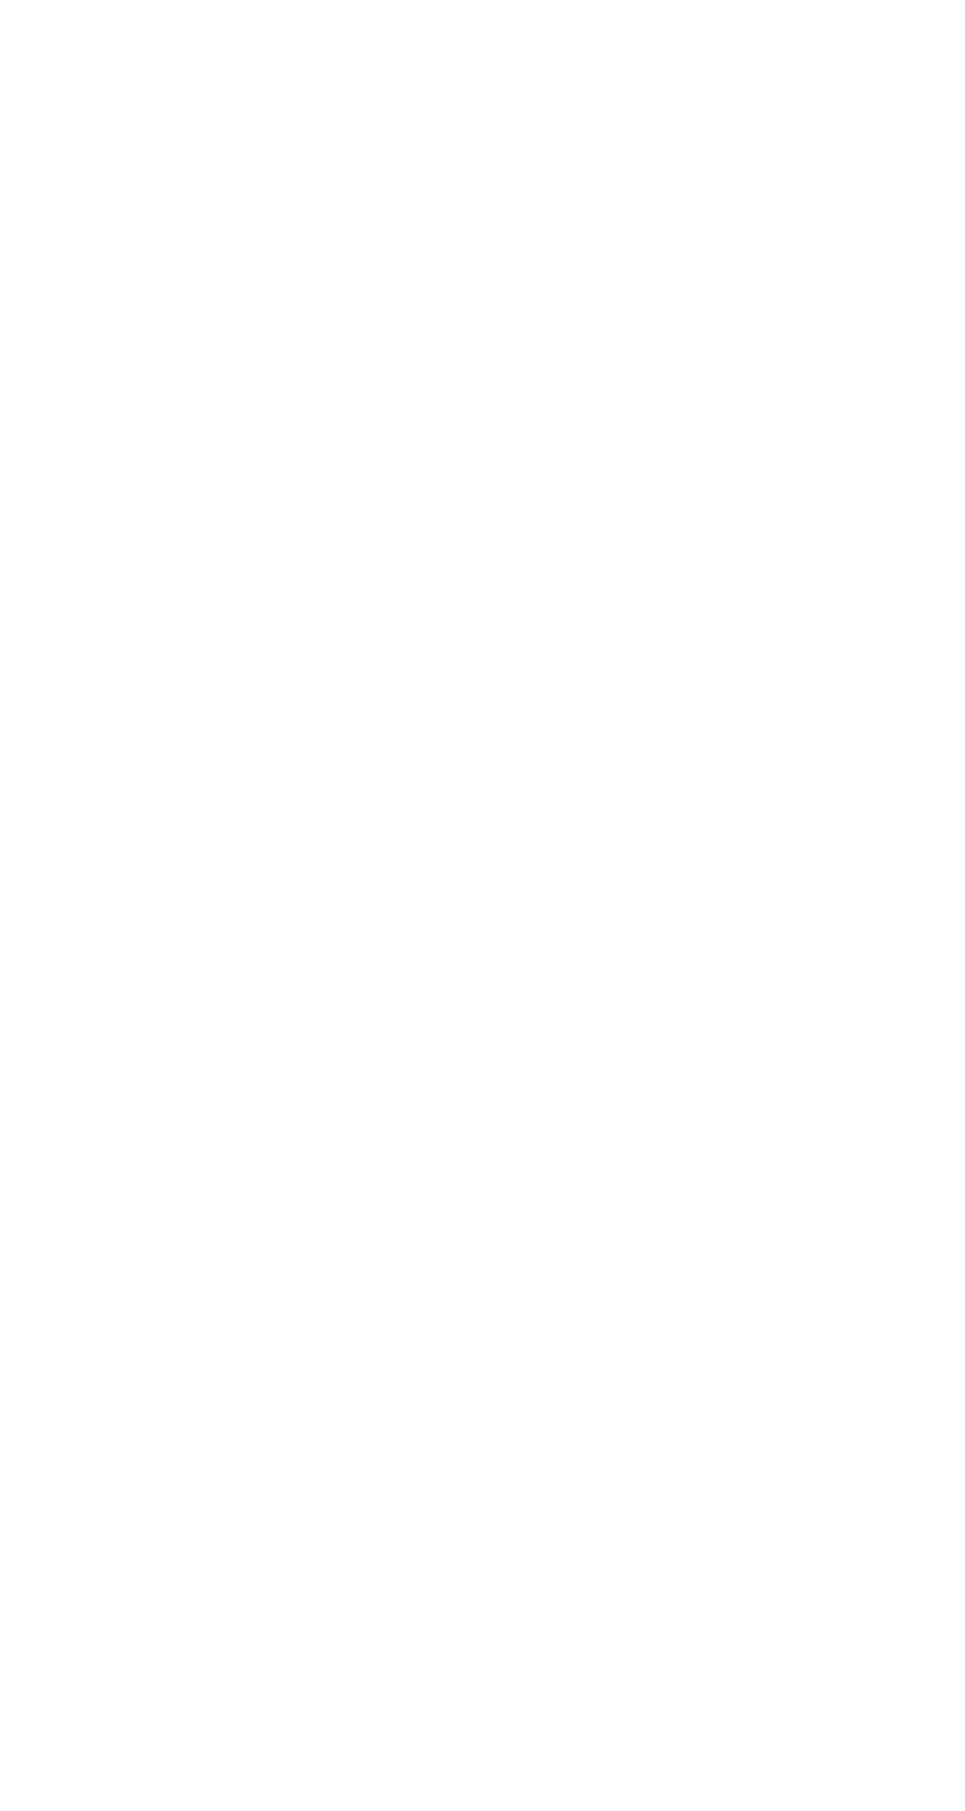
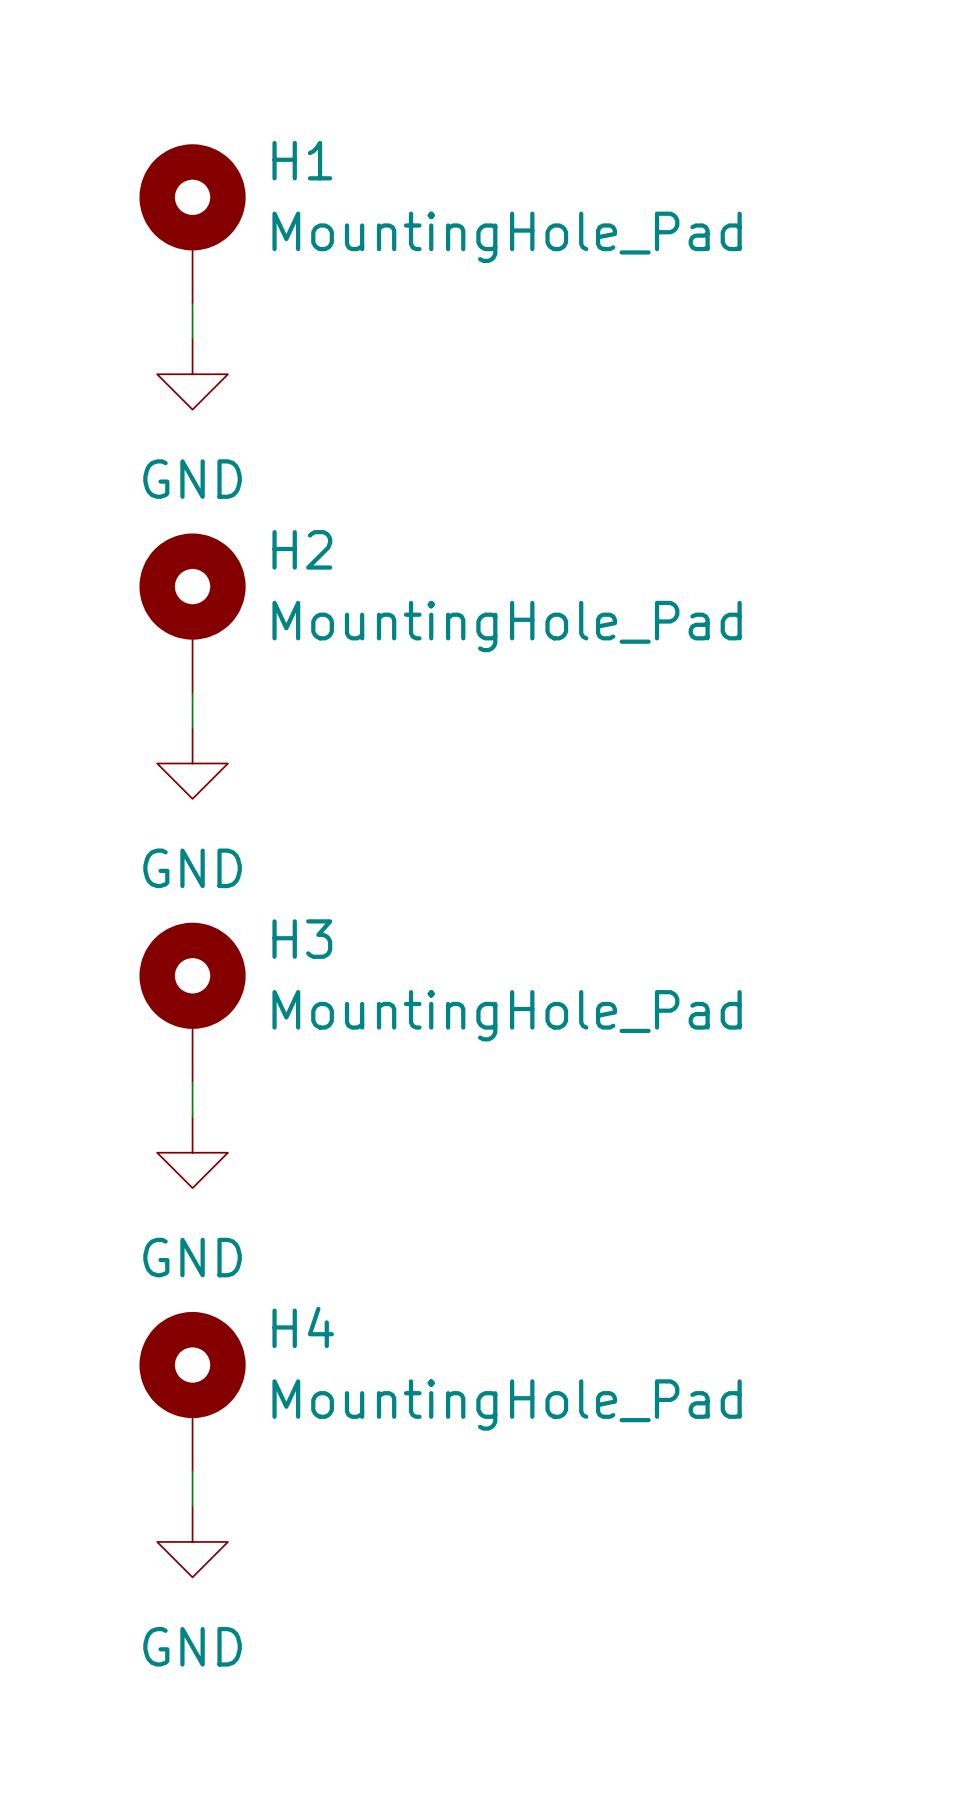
H1: none -> MountingHole_Pad (192, 223)
wire: none -> (192, 303) (192, 338)
power symbol: none -> GND (192, 374)
H2: none -> MountingHole_Pad (192, 613)
wire: none -> (192, 692) (192, 728)
power symbol: none -> GND (192, 763)
H3: none -> MountingHole_Pad (192, 1002)
wire: none -> (192, 1081) (192, 1117)
power symbol: none -> GND (192, 1152)
H4: none -> MountingHole_Pad (192, 1391)
wire: none -> (192, 1471) (192, 1506)
power symbol: none -> GND (192, 1541)

